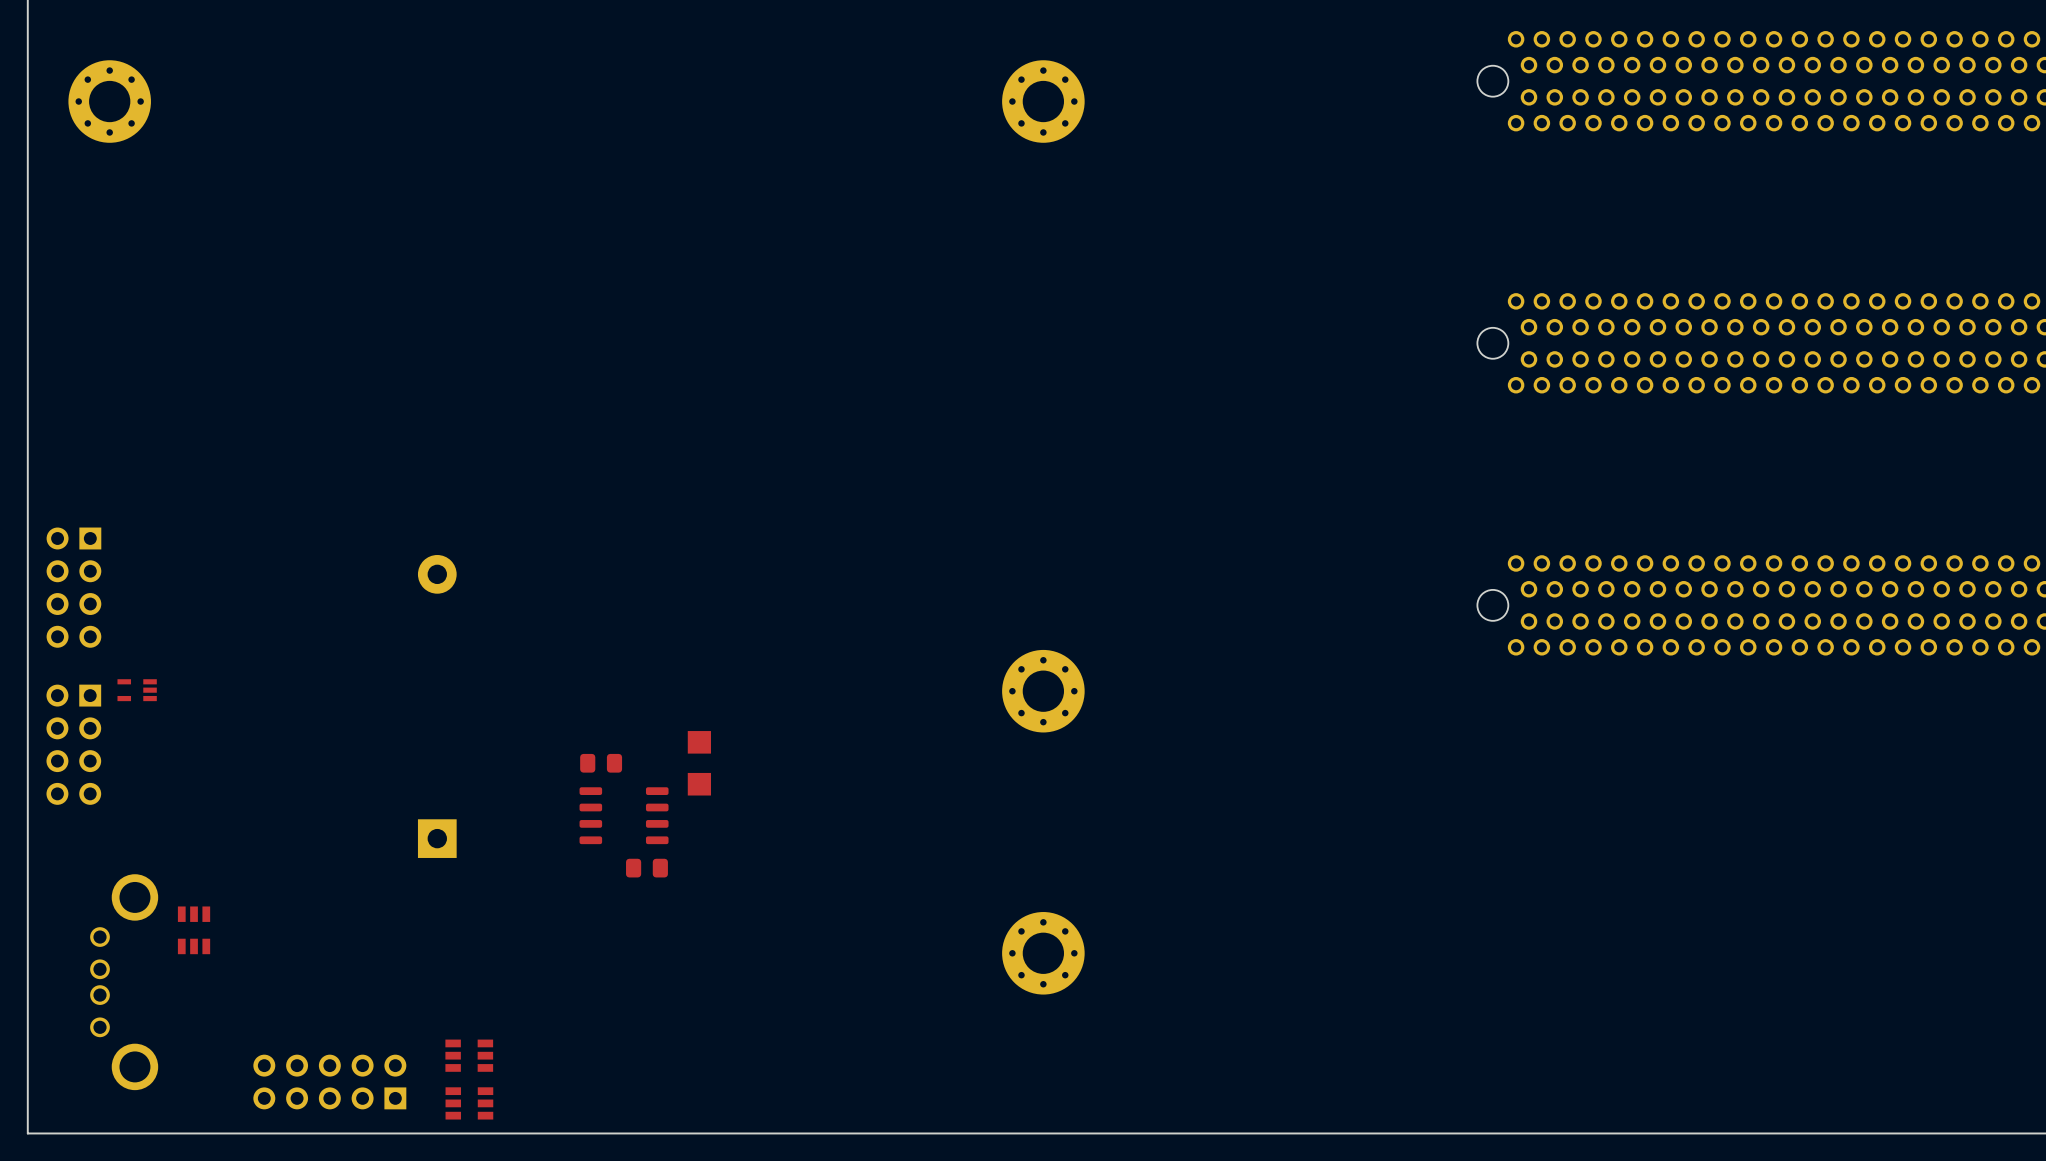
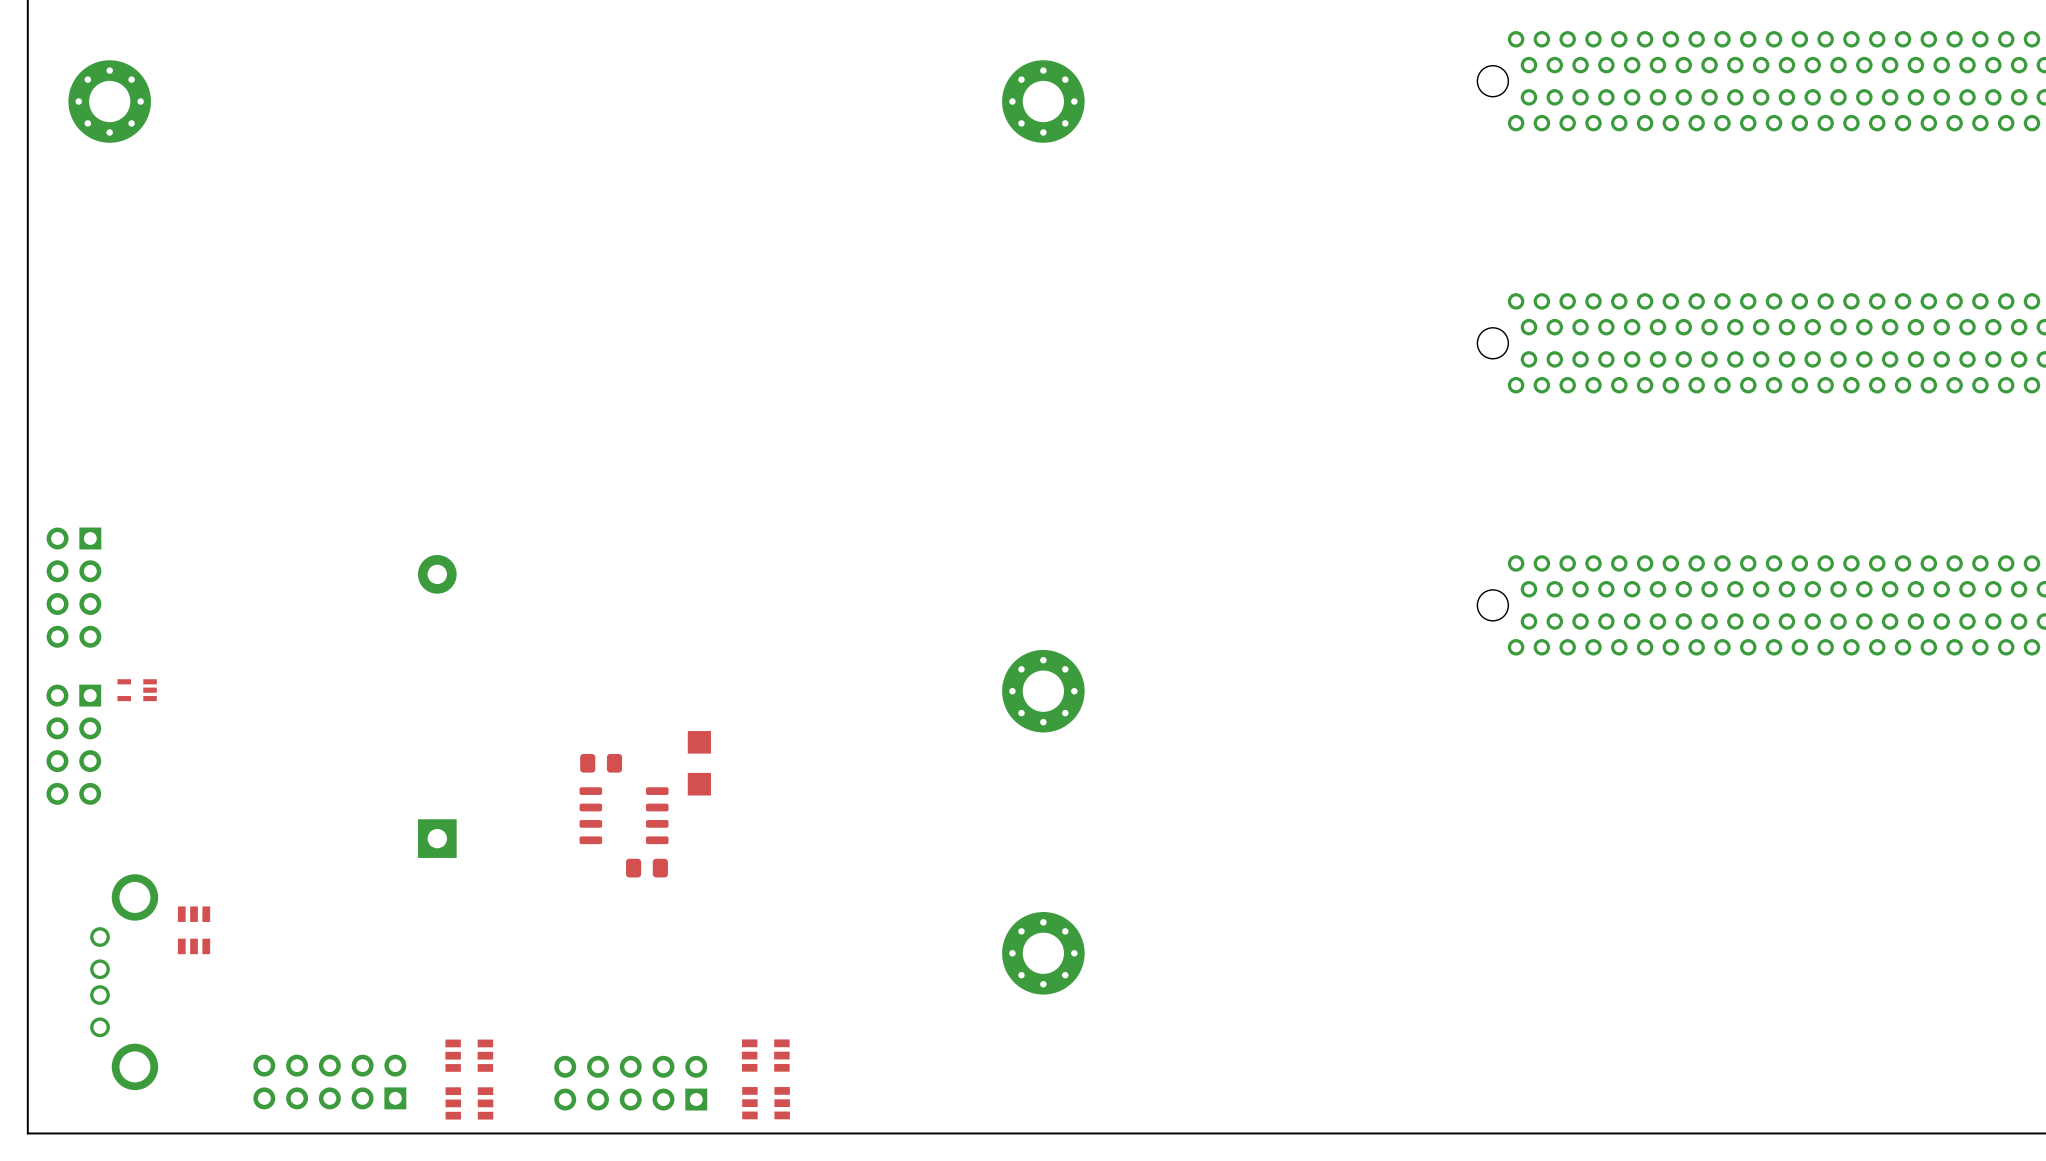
part: none -> (765, 1055)
part: none -> (630, 1083)
part: none -> (766, 1103)

